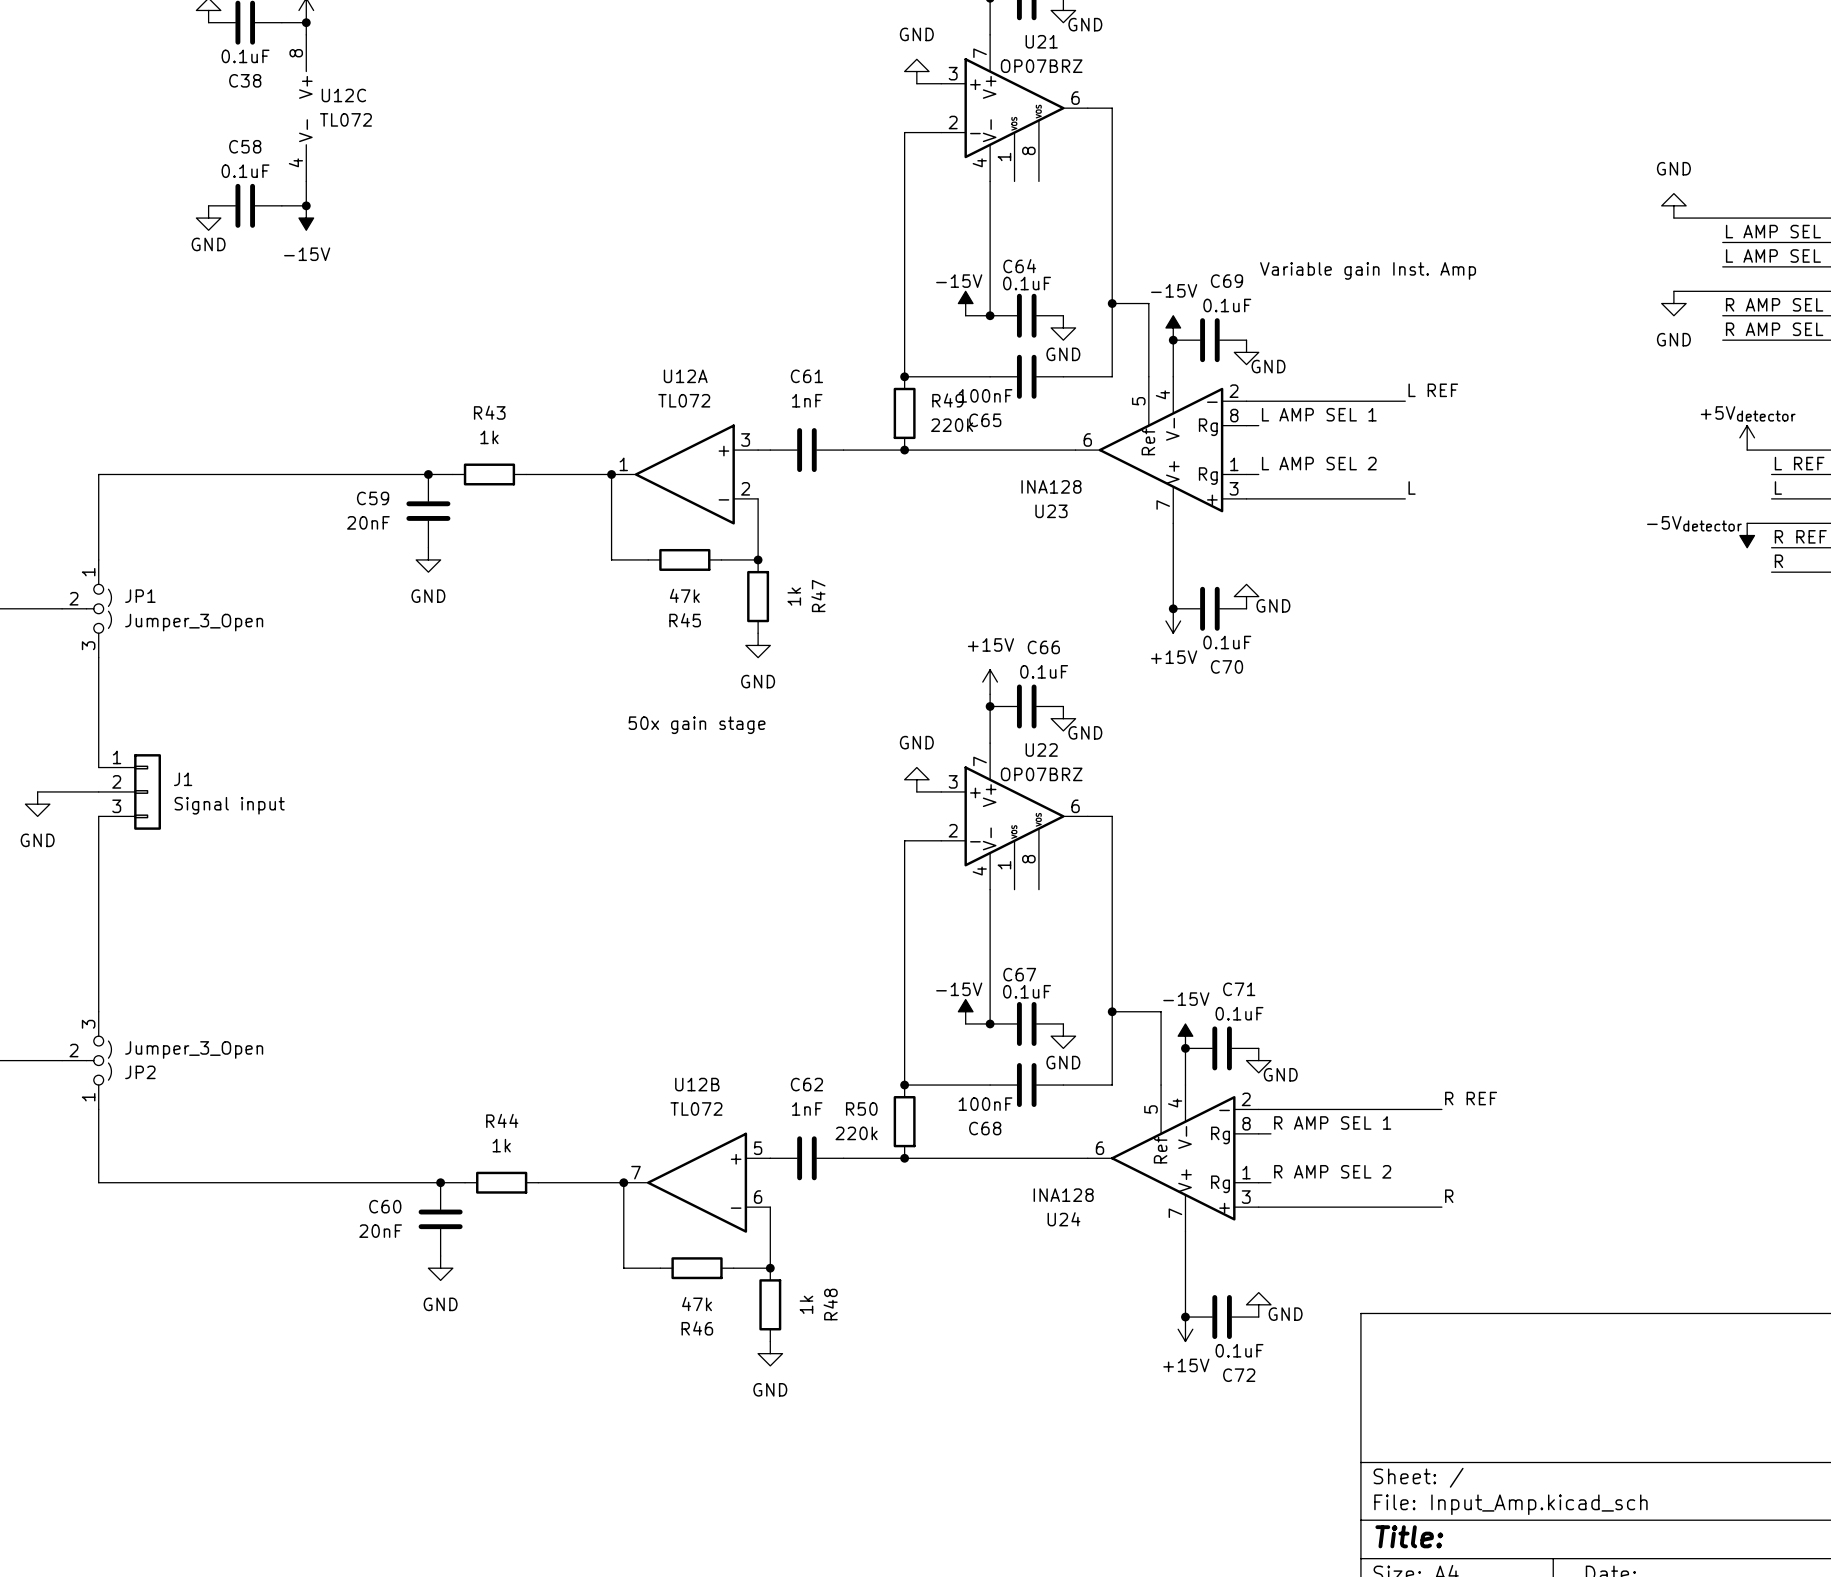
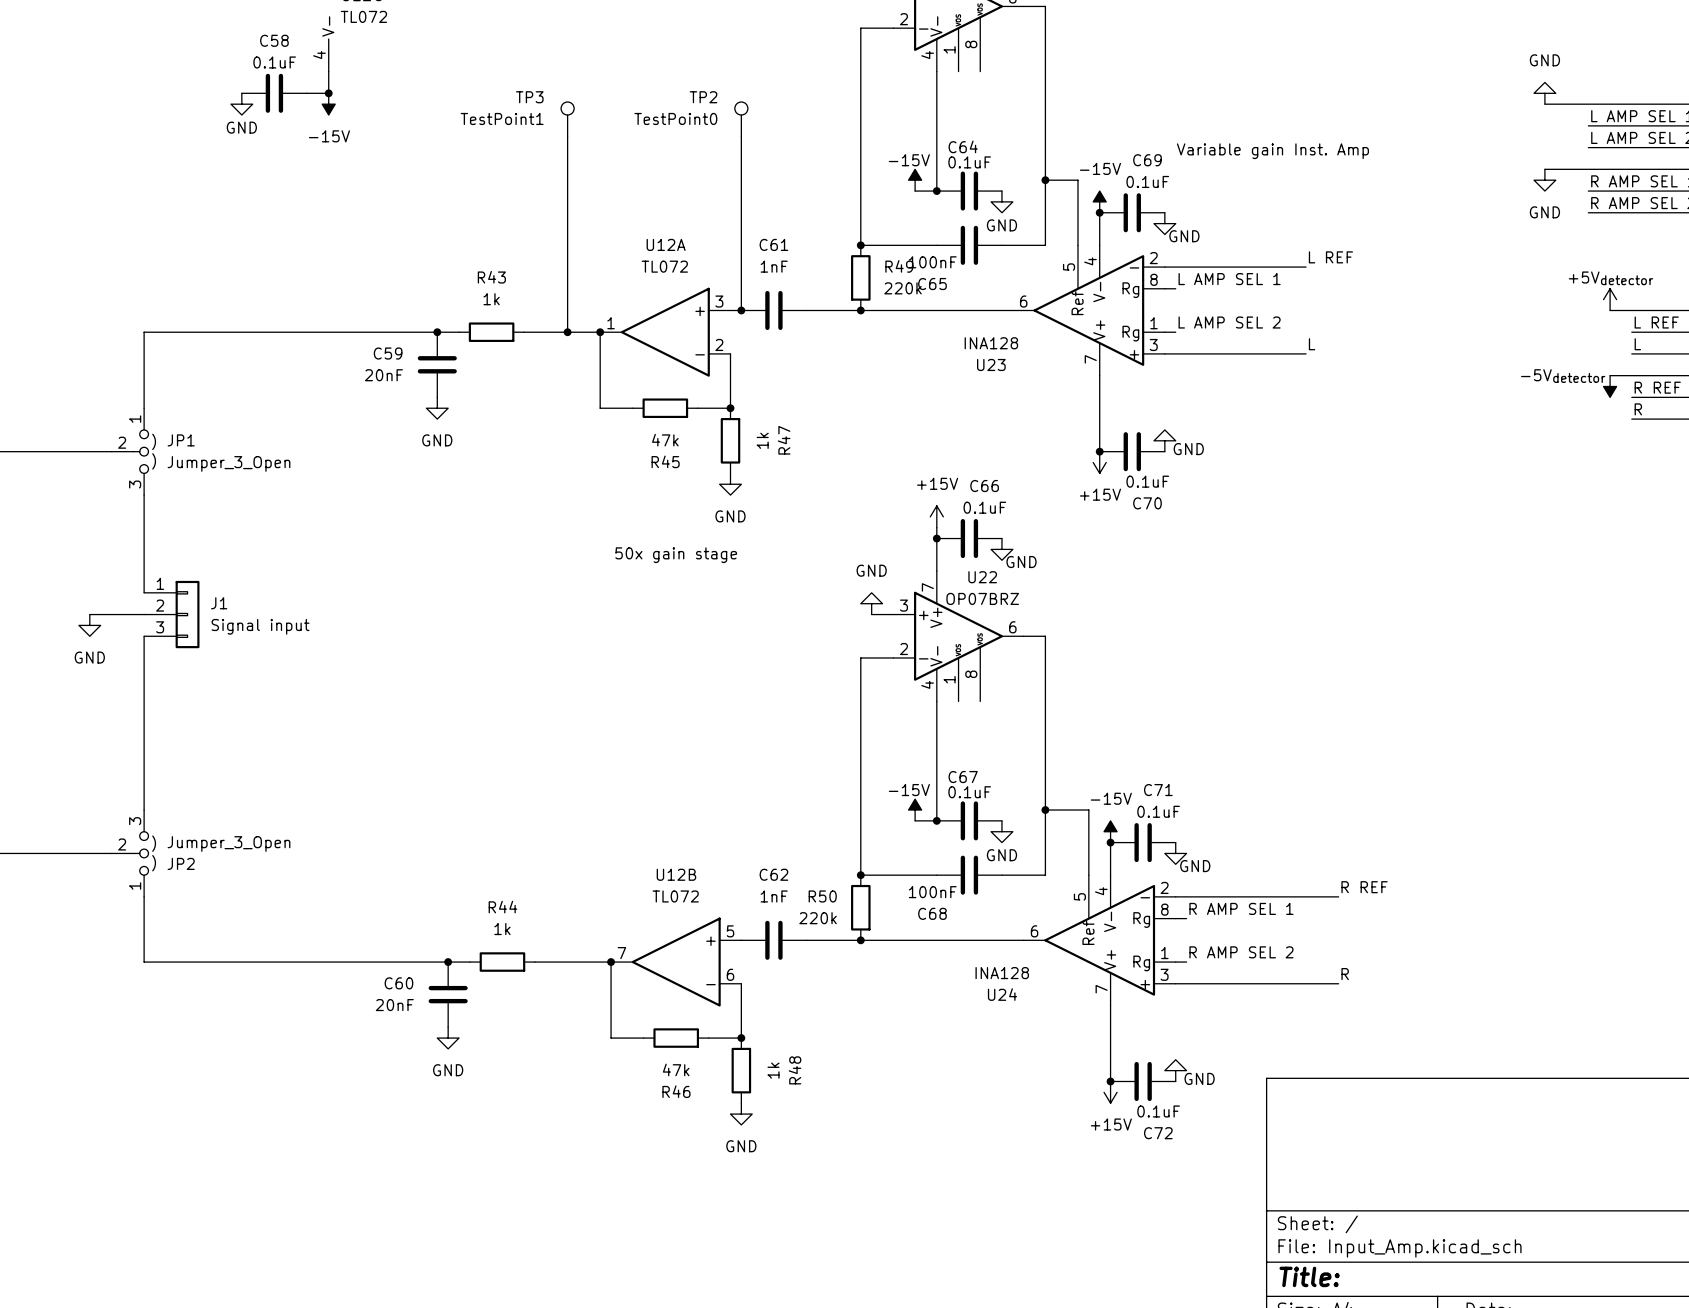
TP3: none -> TestPoint1 (567, 119)
TP2: none -> TestPoint0 (741, 119)
wire: none -> (567, 136) (567, 332)
wire: none -> (741, 136) (741, 310)
junction: none -> (741, 310)
junction: none -> (567, 332)

